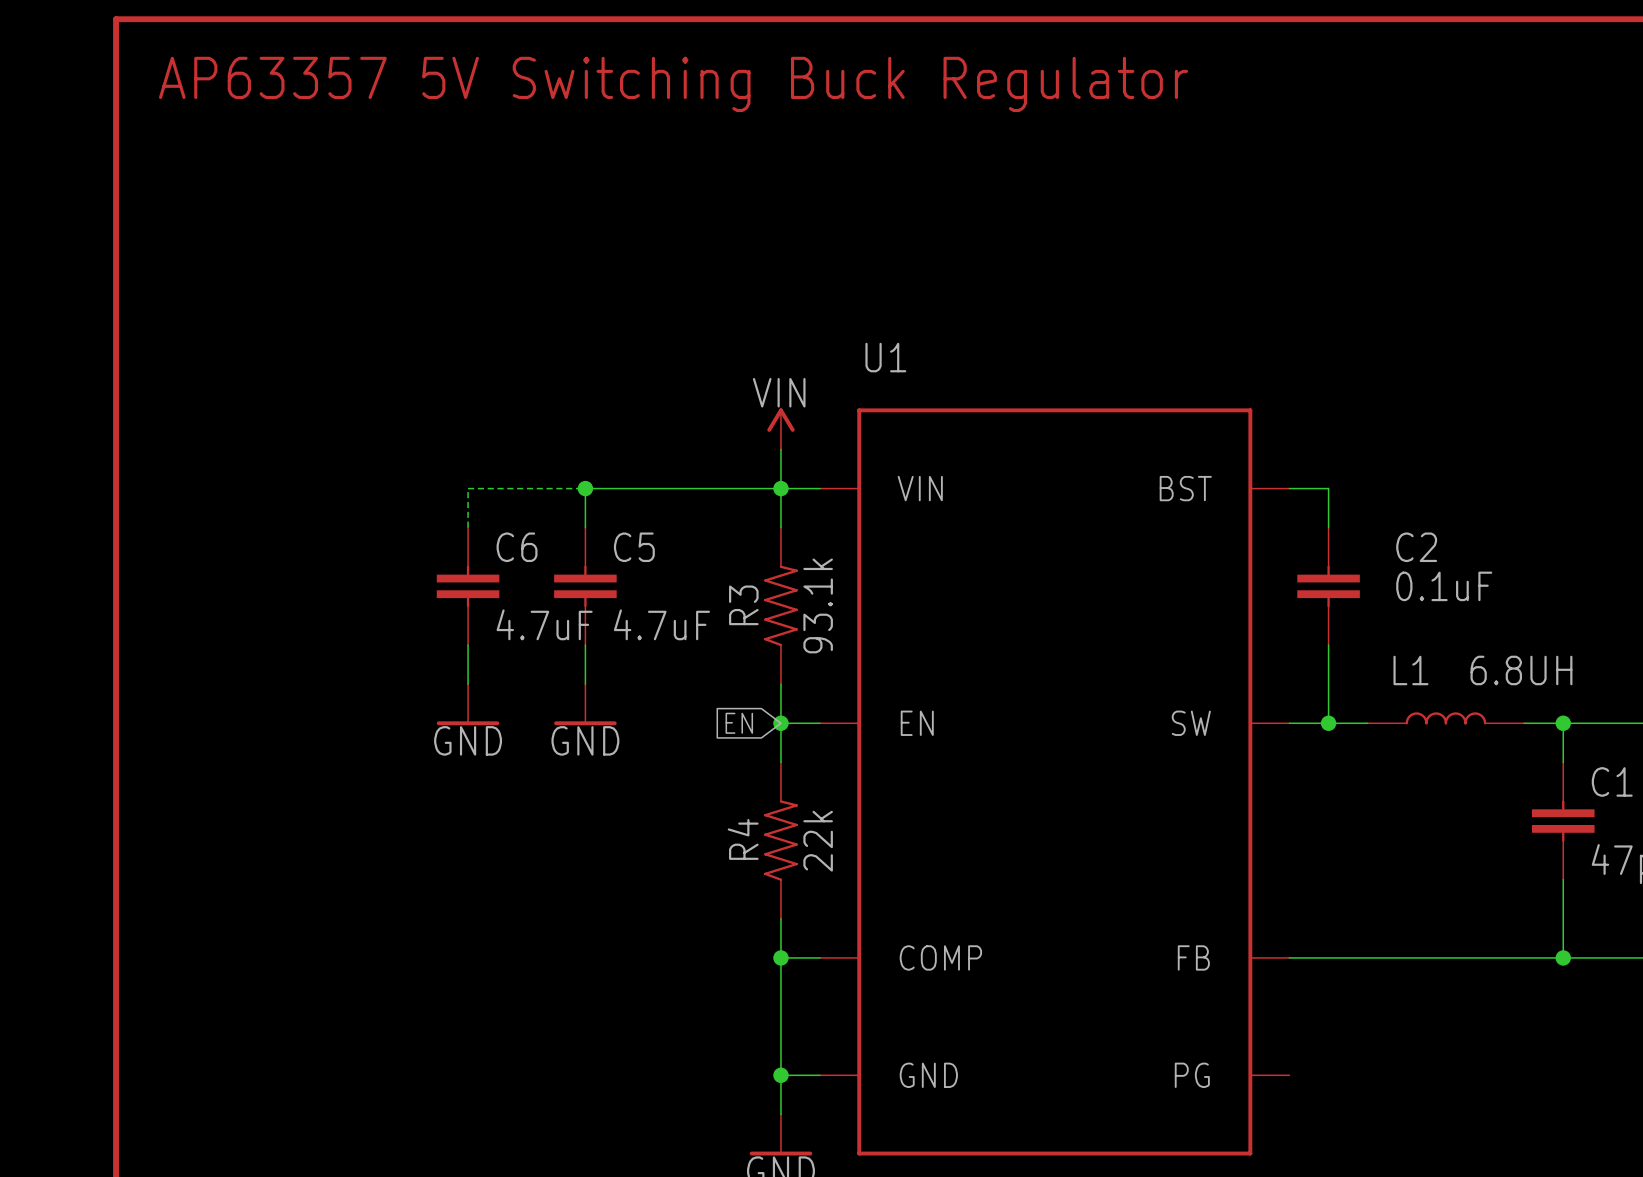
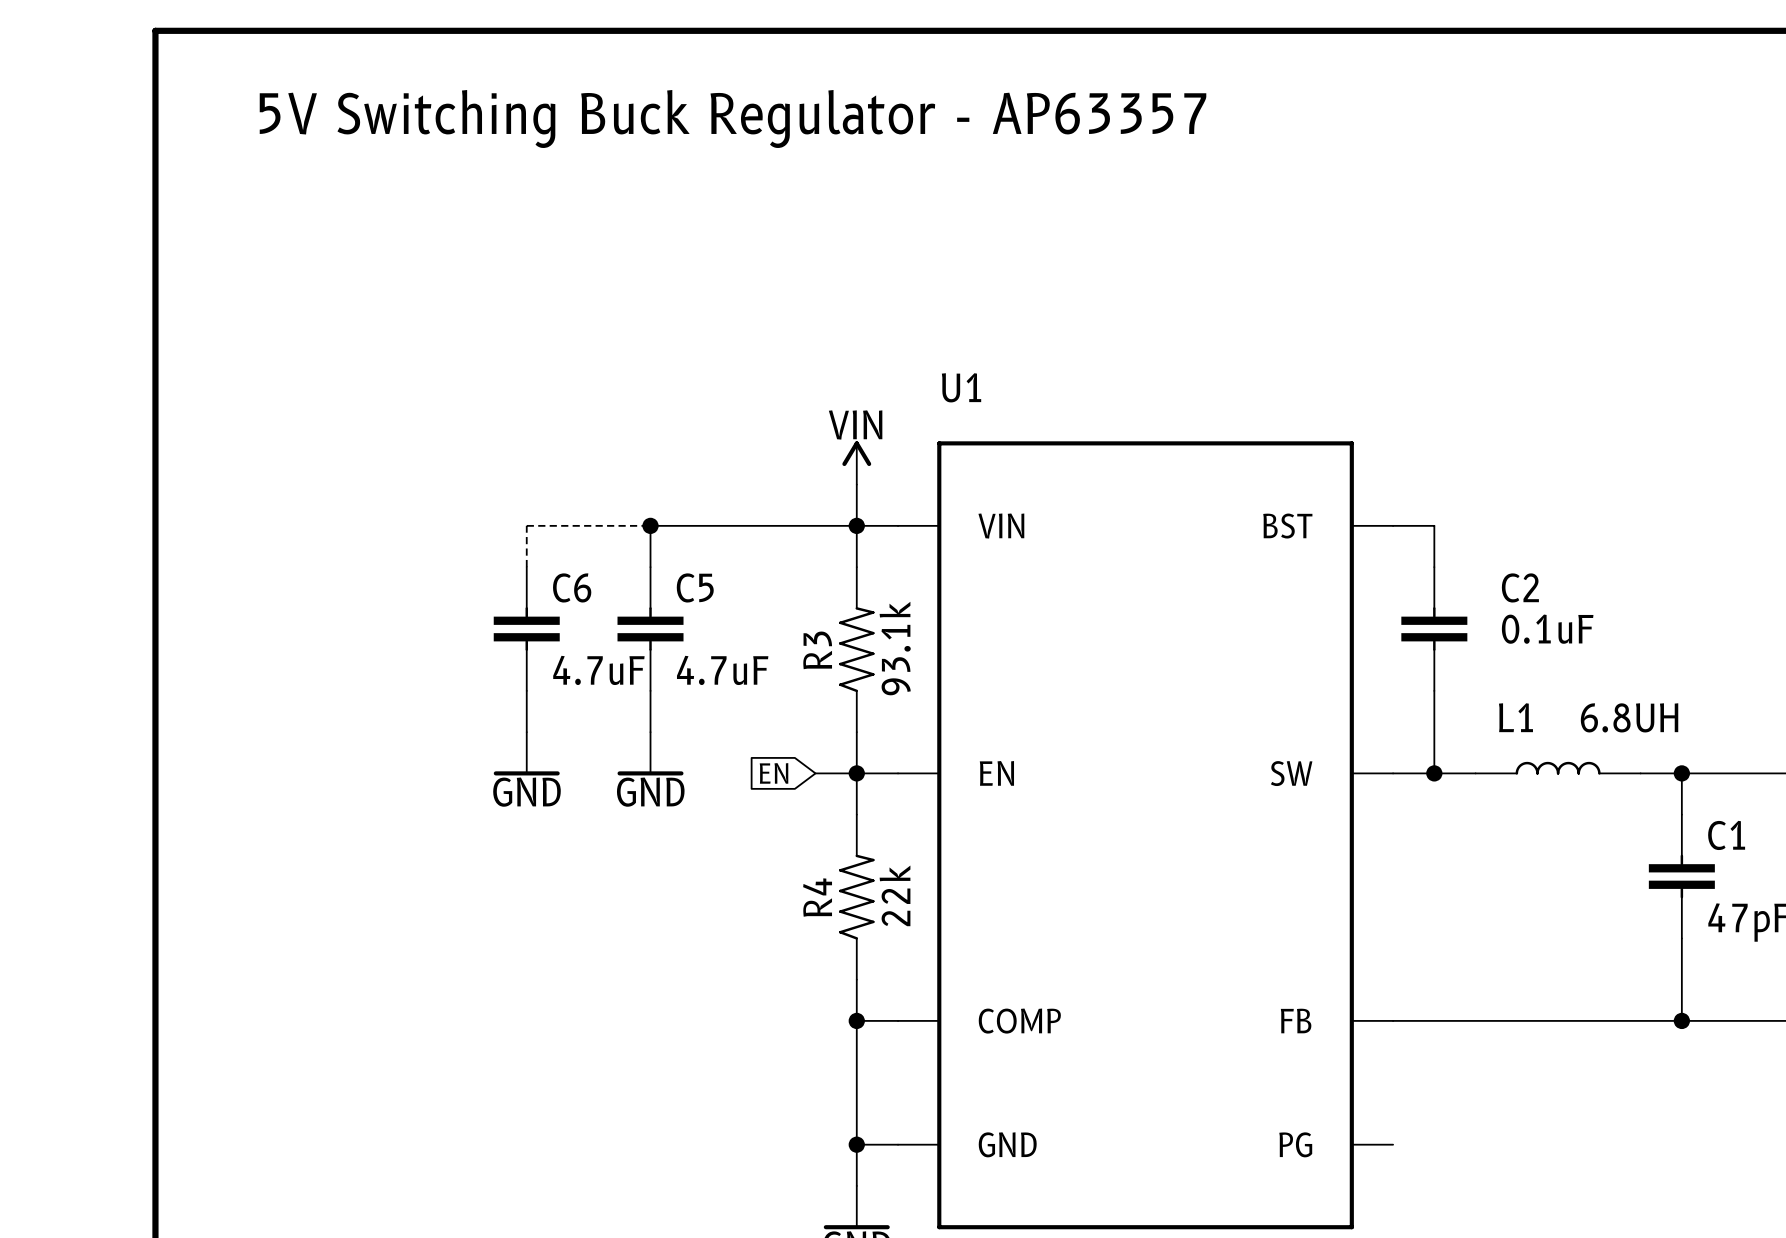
text: AP63357 5V Switching Buck Regulator (673, 84) -> none
text: none -> 5V Switching Buck Regulator - AP63357 (733, 118)
global label position: EN (739, 723) -> EN (774, 773)
wire: none -> (815, 773) (856, 773)

